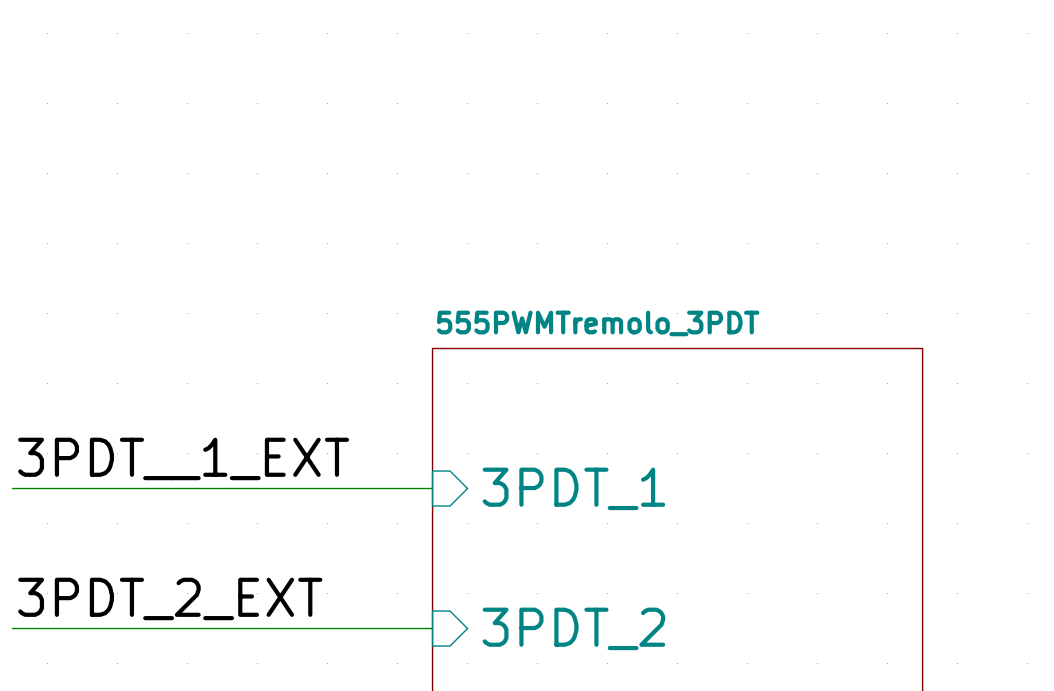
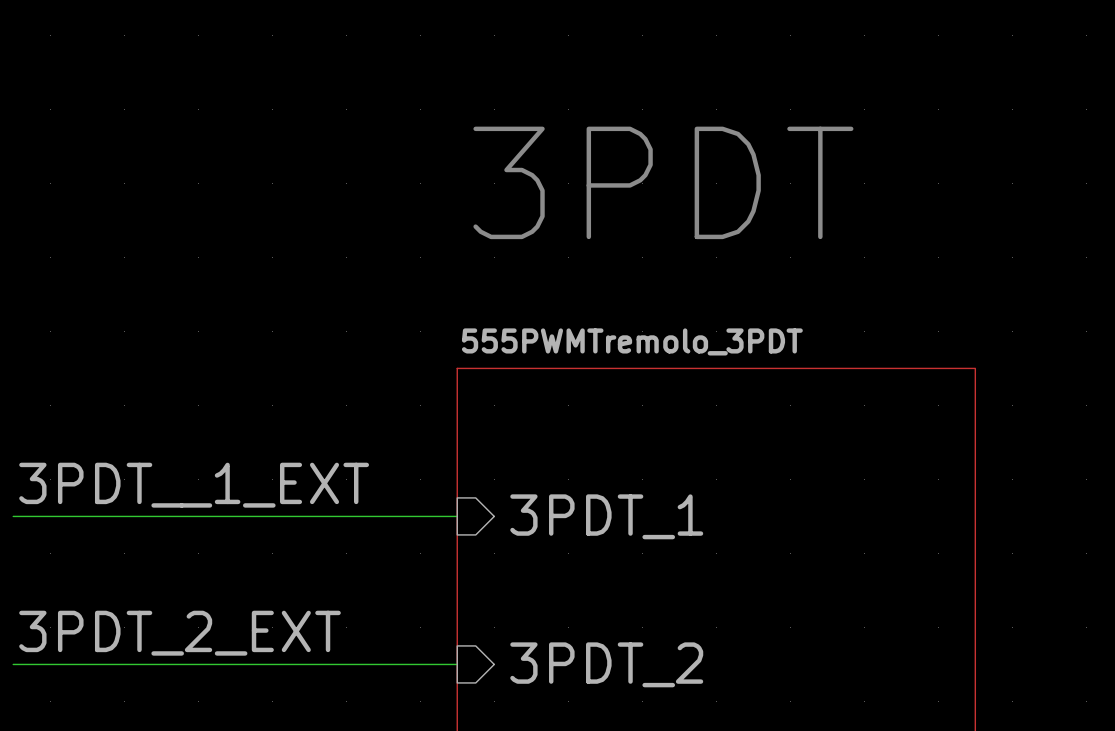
text: none -> 3PDT (663, 182)

